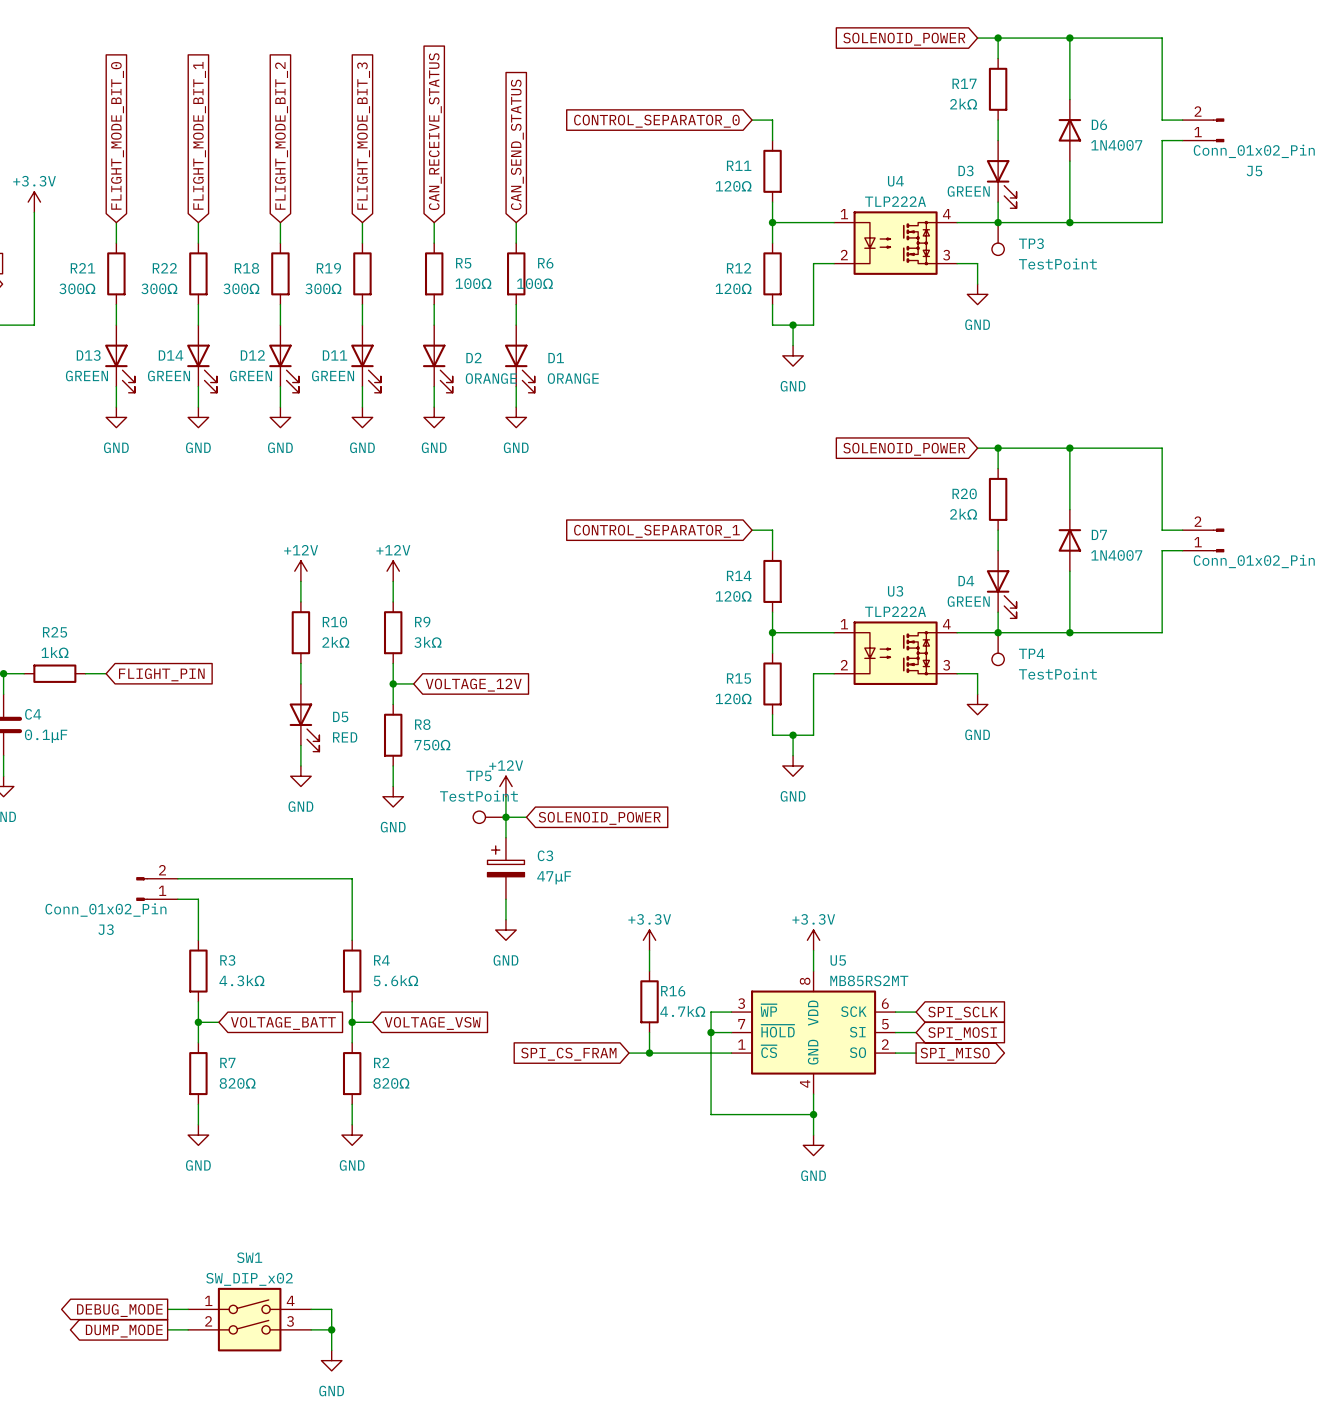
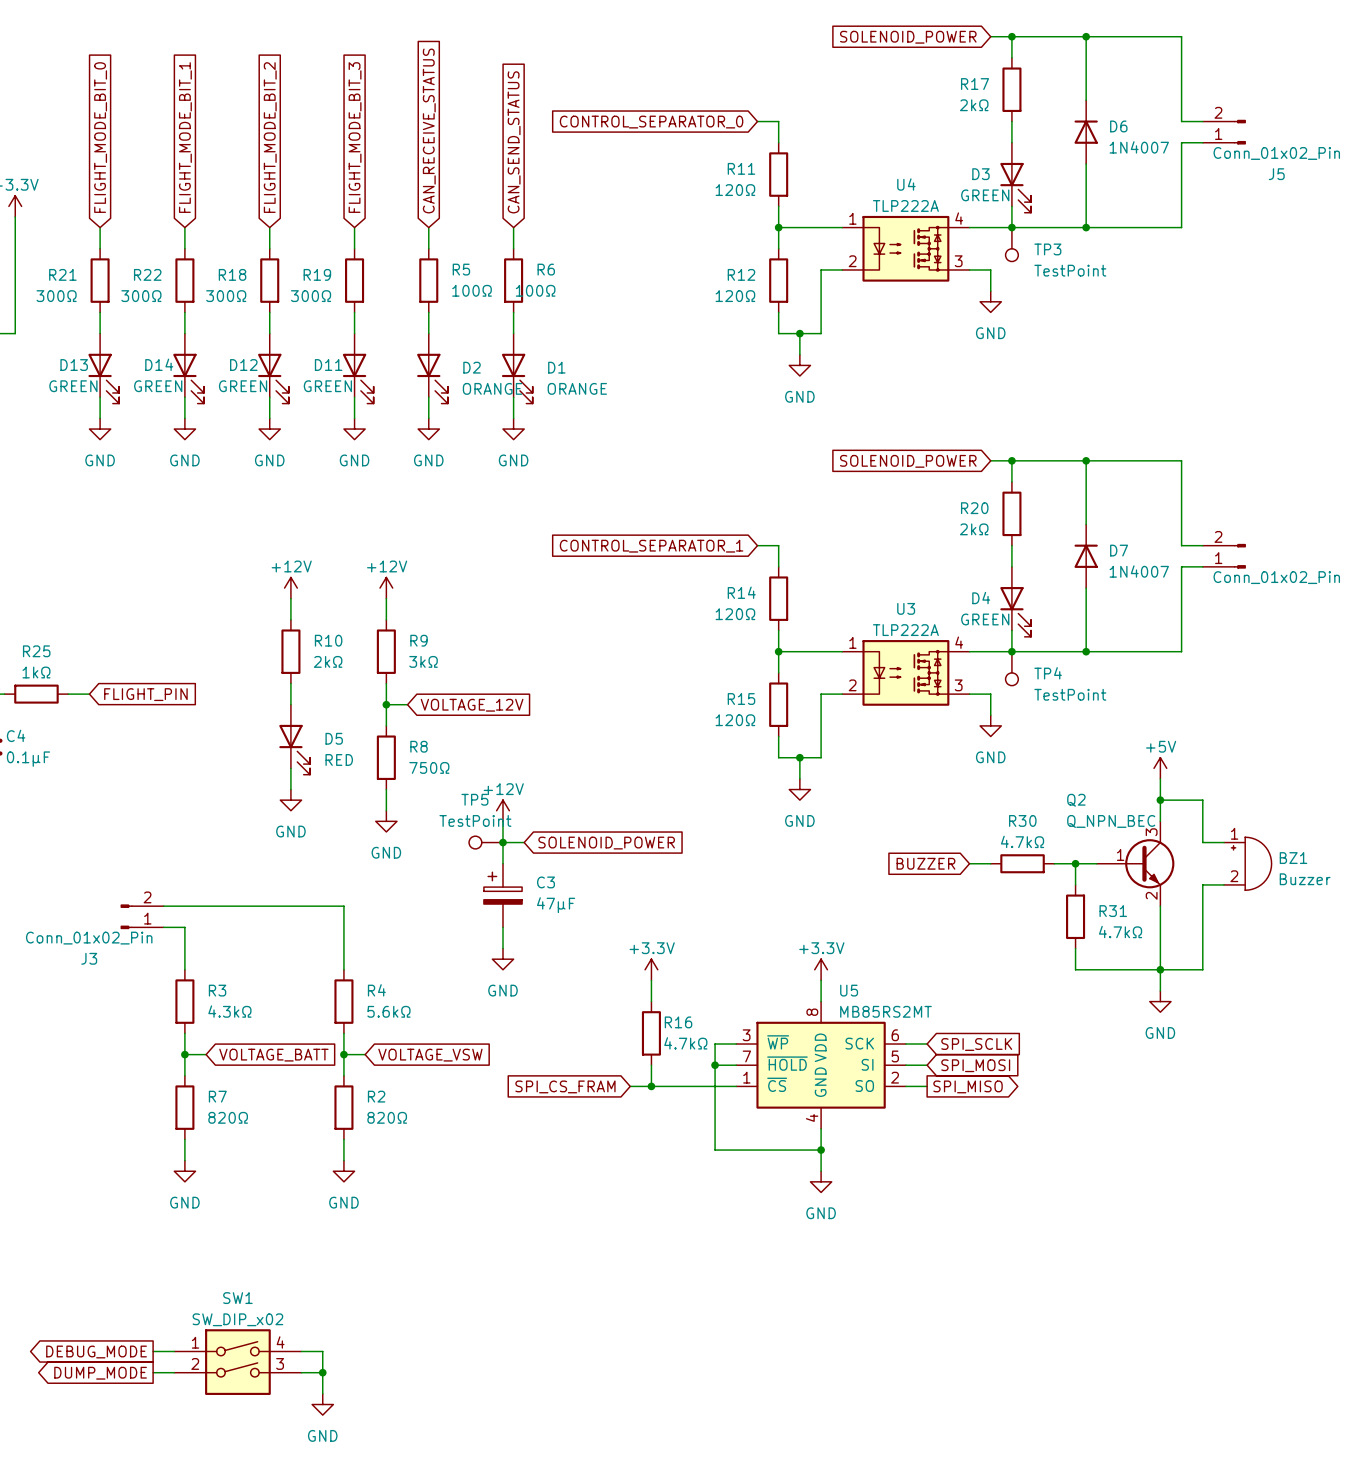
power symbol: none -> +5V (1160, 768)
wire: none -> (1160, 778) (1160, 821)
wire: none -> (1160, 800) (1202, 800) (1202, 842) (1224, 842)
junction: none -> (1160, 800)
global label: none -> BUZZER (925, 863)
wire: none -> (969, 863) (990, 863)
R30: none -> 4.7kΩ (1022, 863)
wire: none -> (1054, 863) (1096, 863)
wire: none -> (1075, 863) (1075, 884)
junction: none -> (1075, 863)
Q2: none -> Q_NPN_BEC (1135, 863)
BZ1: none -> Buzzer (1247, 863)
wire: none -> (1224, 884) (1202, 884) (1202, 969) (1075, 969) (1075, 948)
wire: none -> (1160, 906) (1160, 990)
R31: none -> 4.7kΩ (1075, 916)
junction: none -> (1160, 969)
power symbol: none -> GND (1160, 1001)

